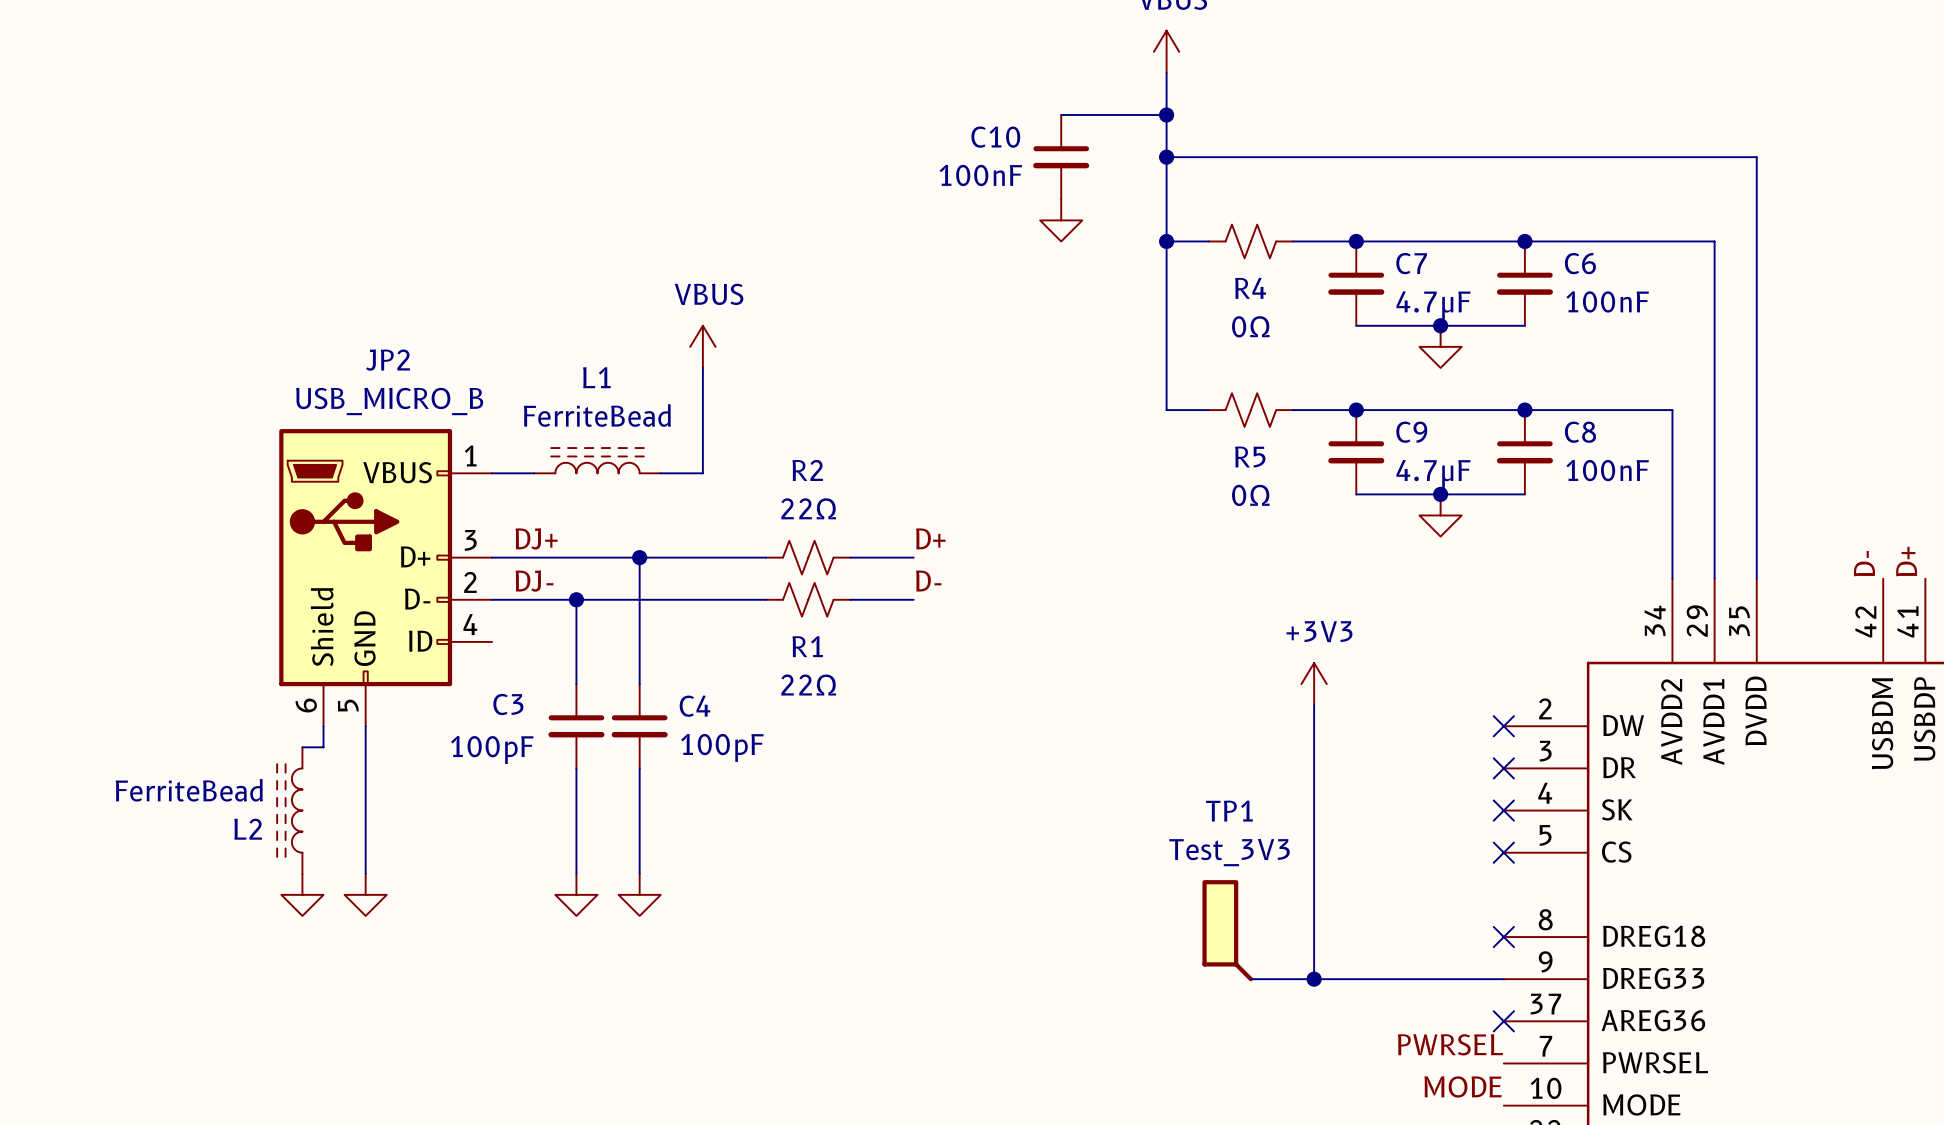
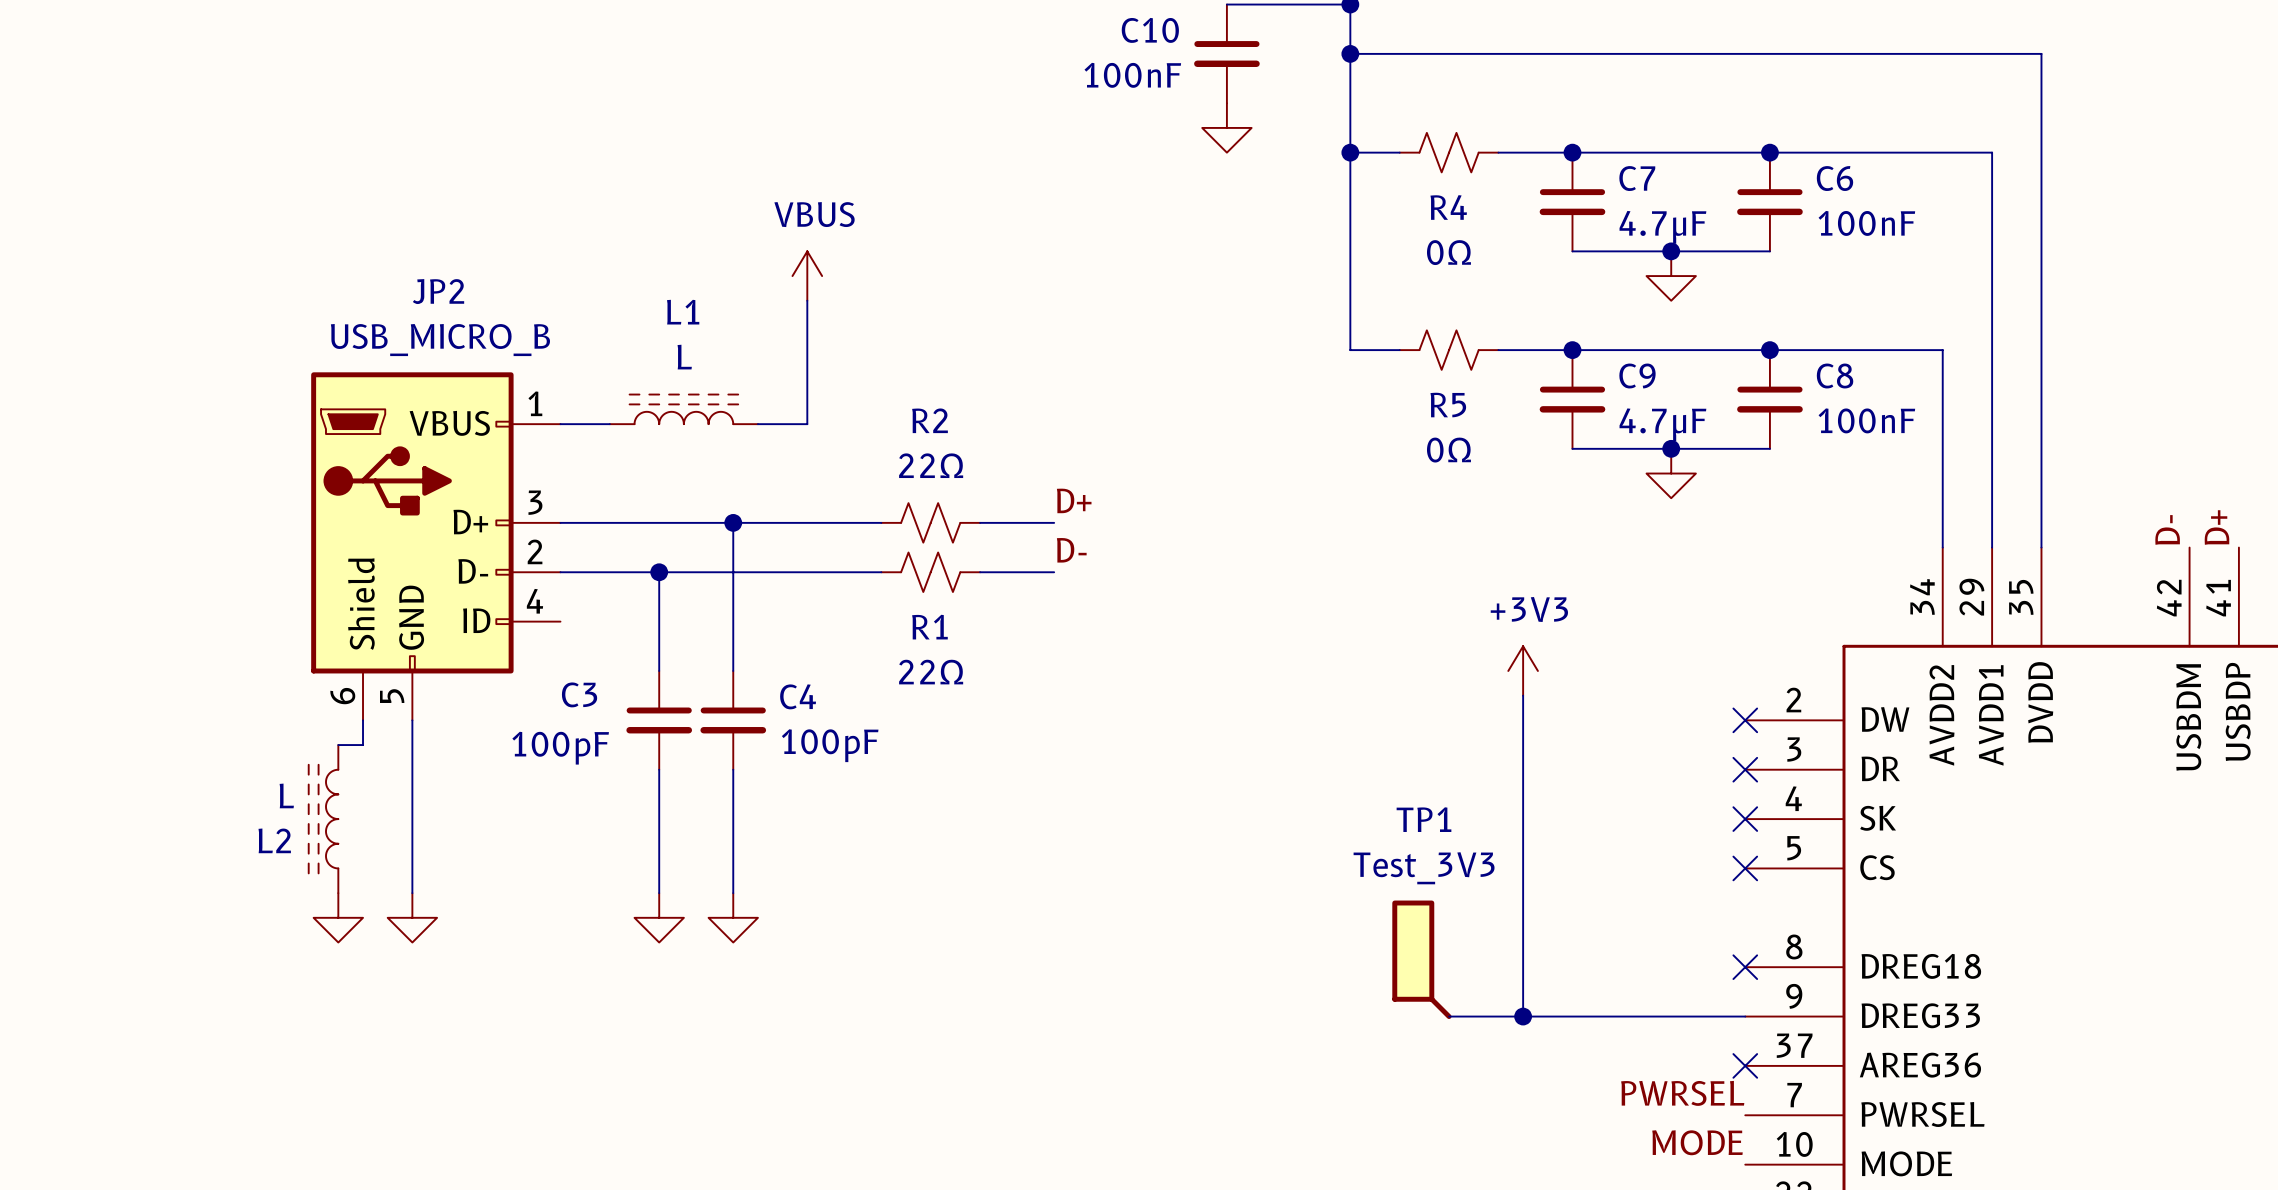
L1 value: FerriteBead (597, 415) -> L (684, 357)
label: DJ+ (536, 538) -> none
label: DJ- (534, 581) -> none
L2 value: FerriteBead (189, 790) -> L (286, 795)

